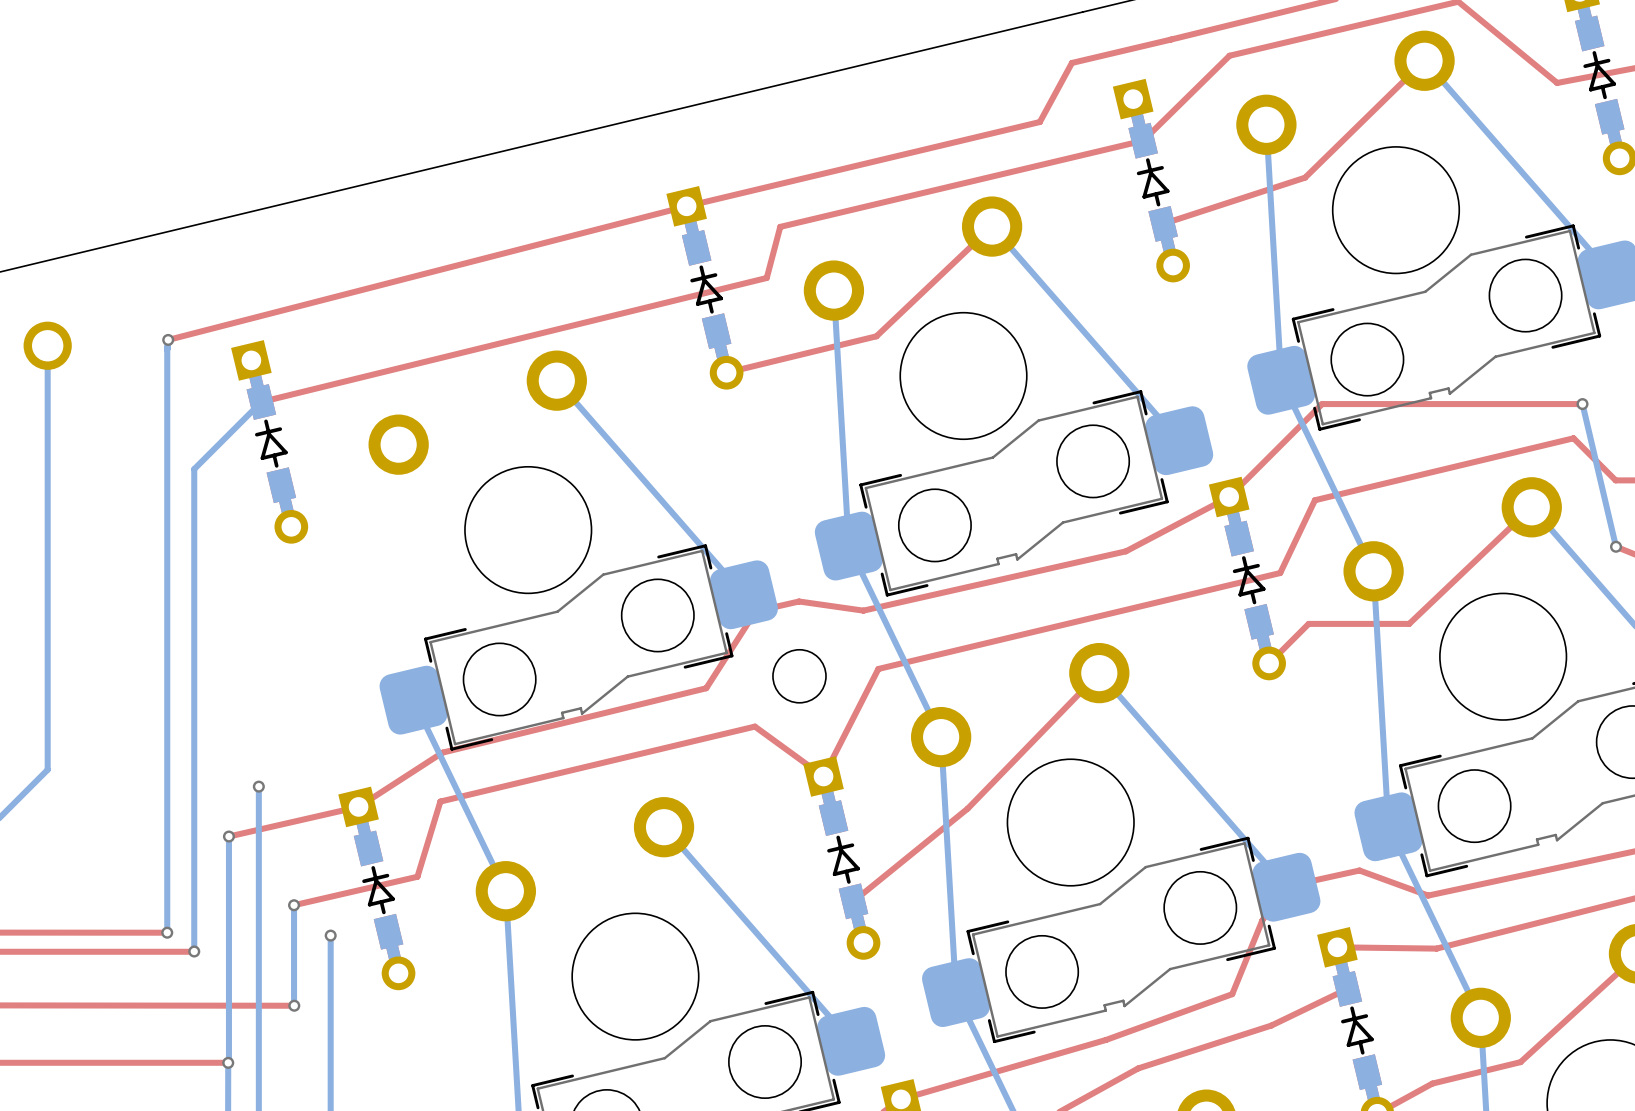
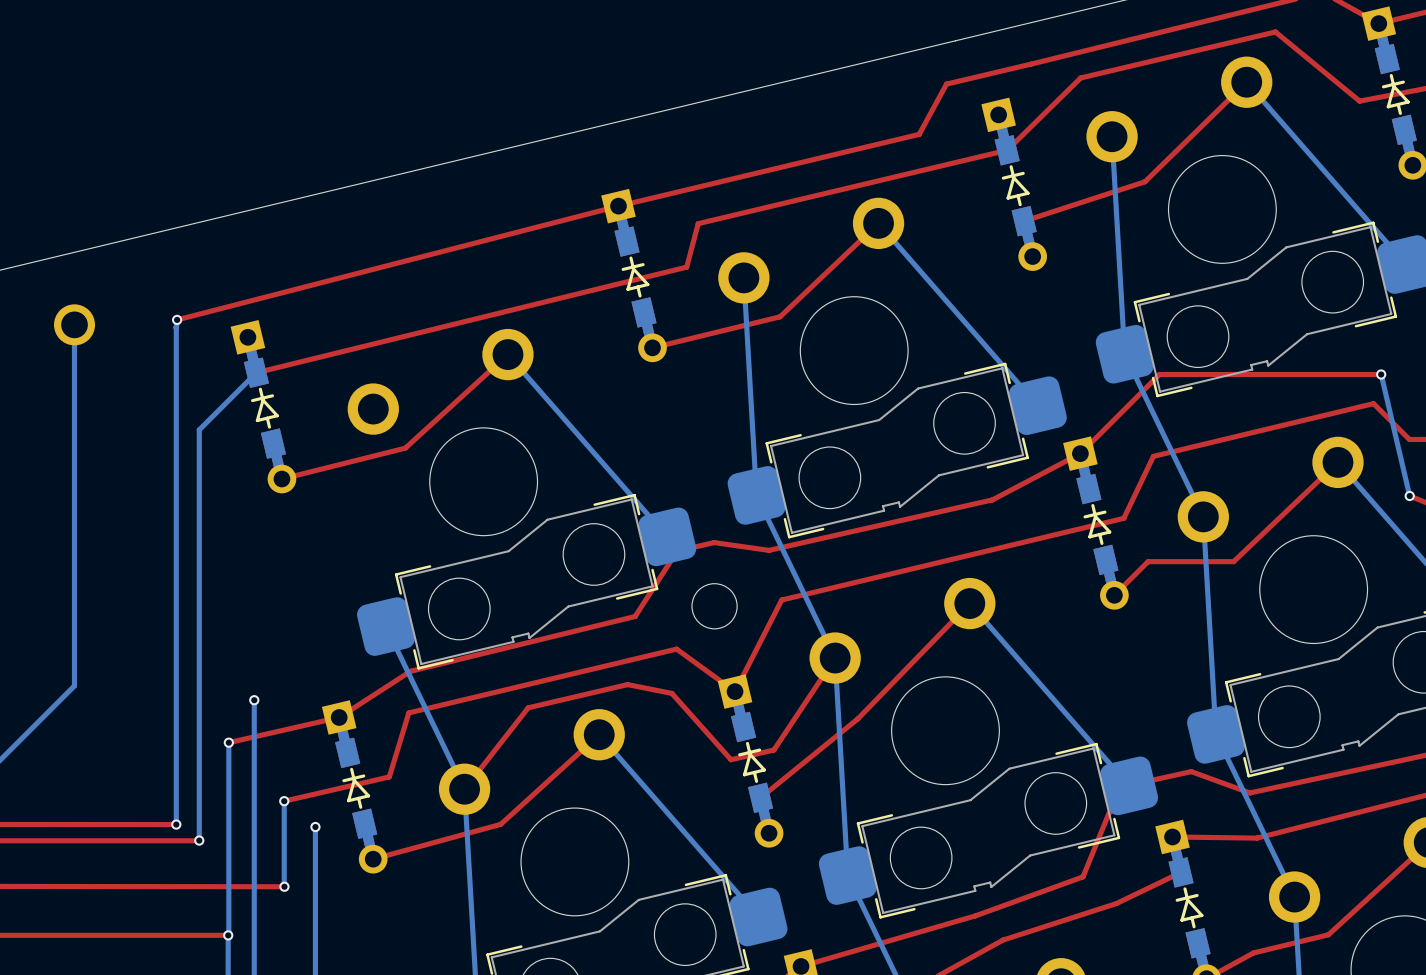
top track: none -> (507, 354) (405, 448) (281, 479)
top track: none -> (835, 658) (773, 750) (731, 759) (671, 693) (627, 684) (528, 707) (464, 789)
top track: none -> (599, 734) (500, 824) (373, 859)

